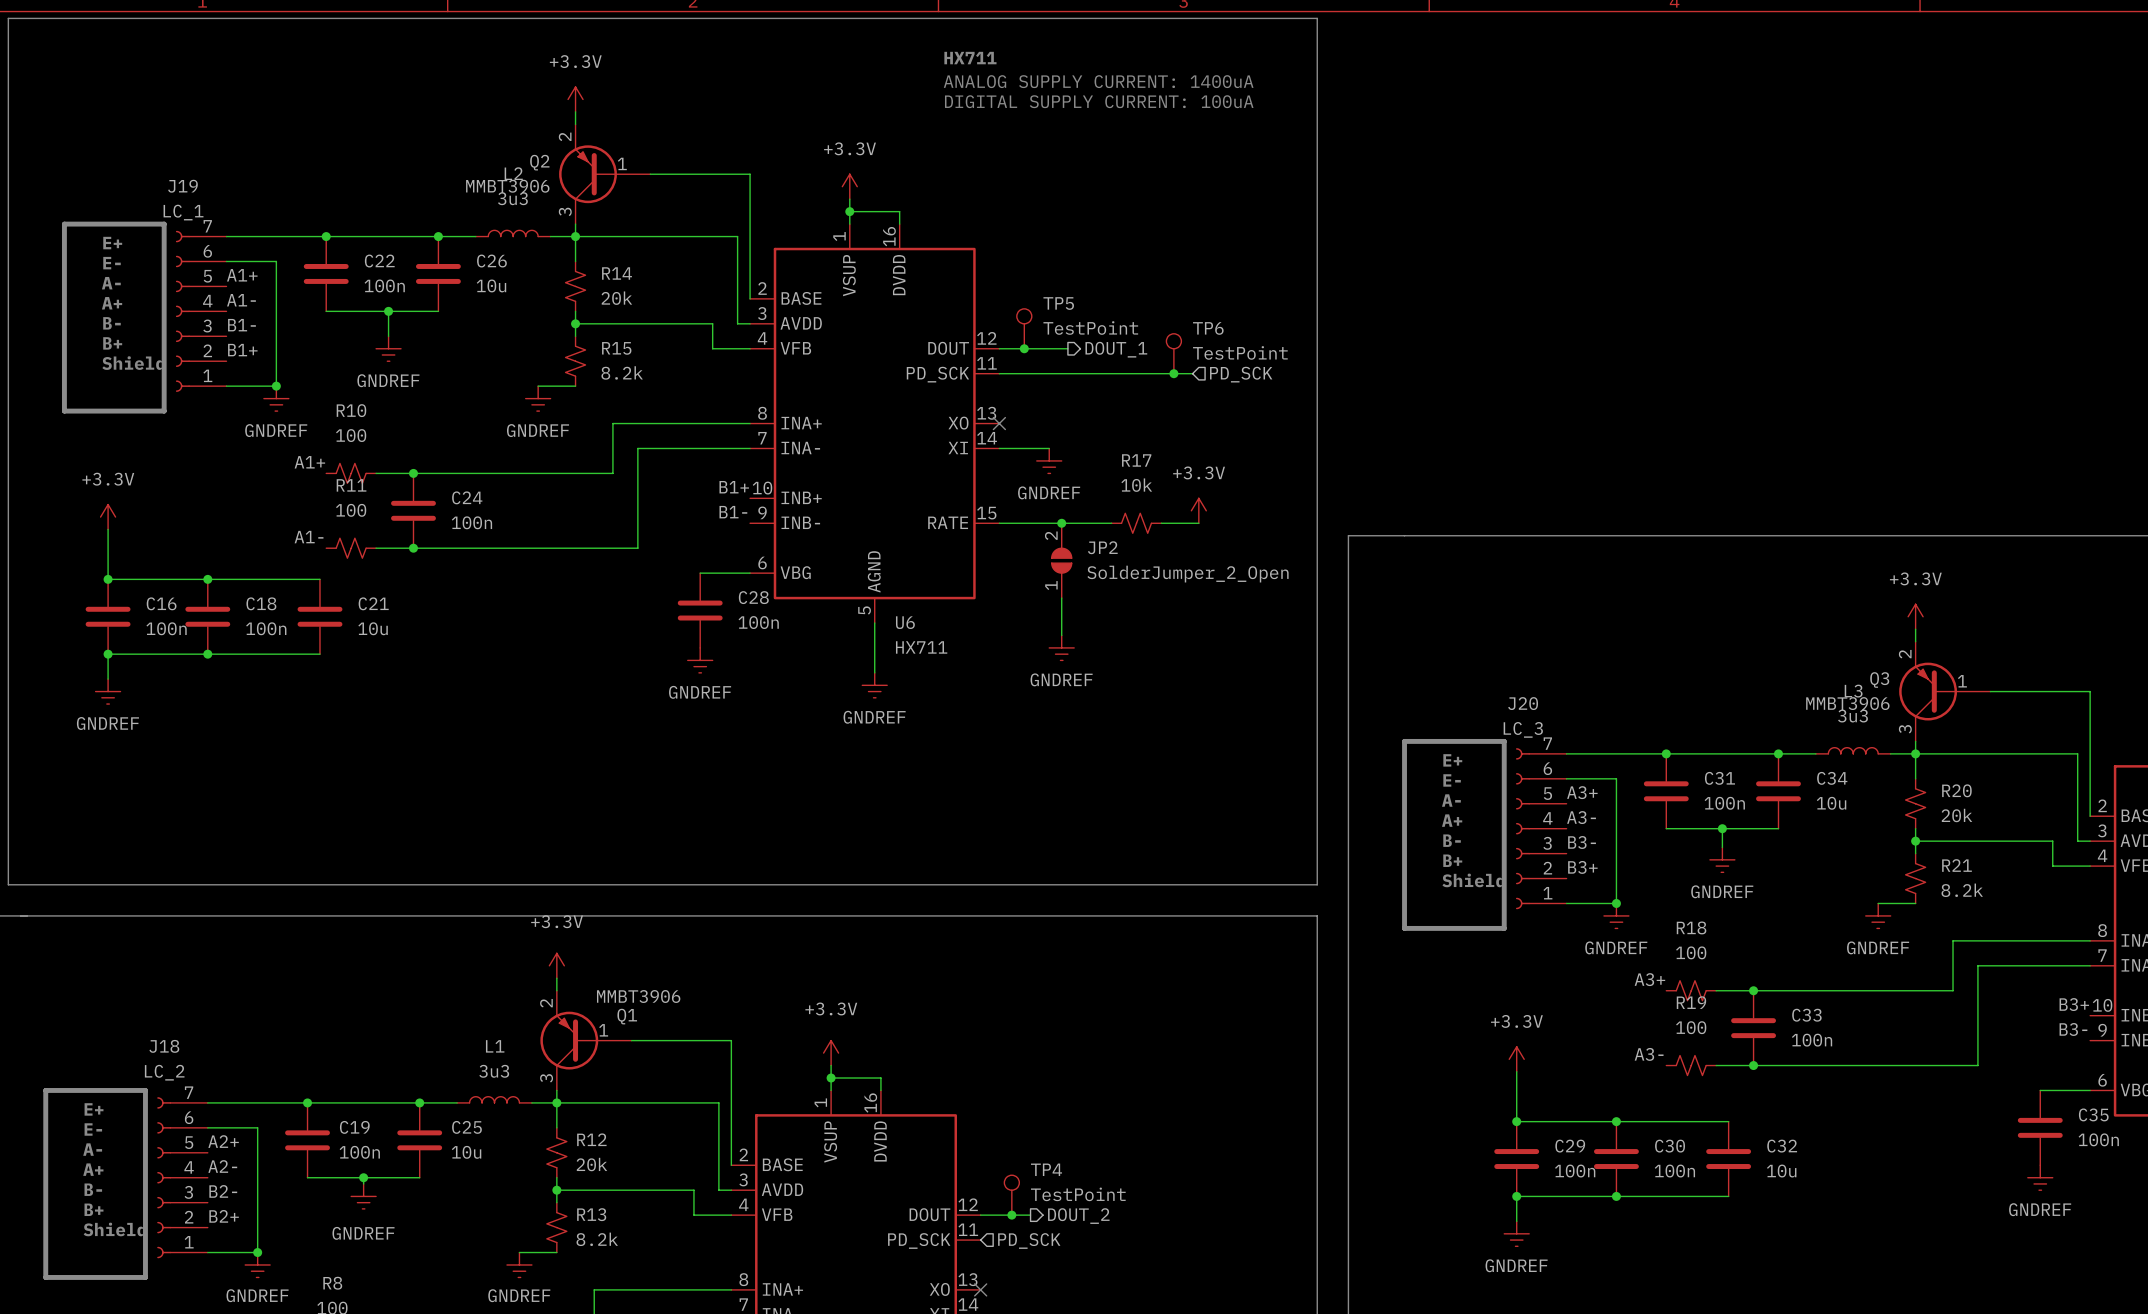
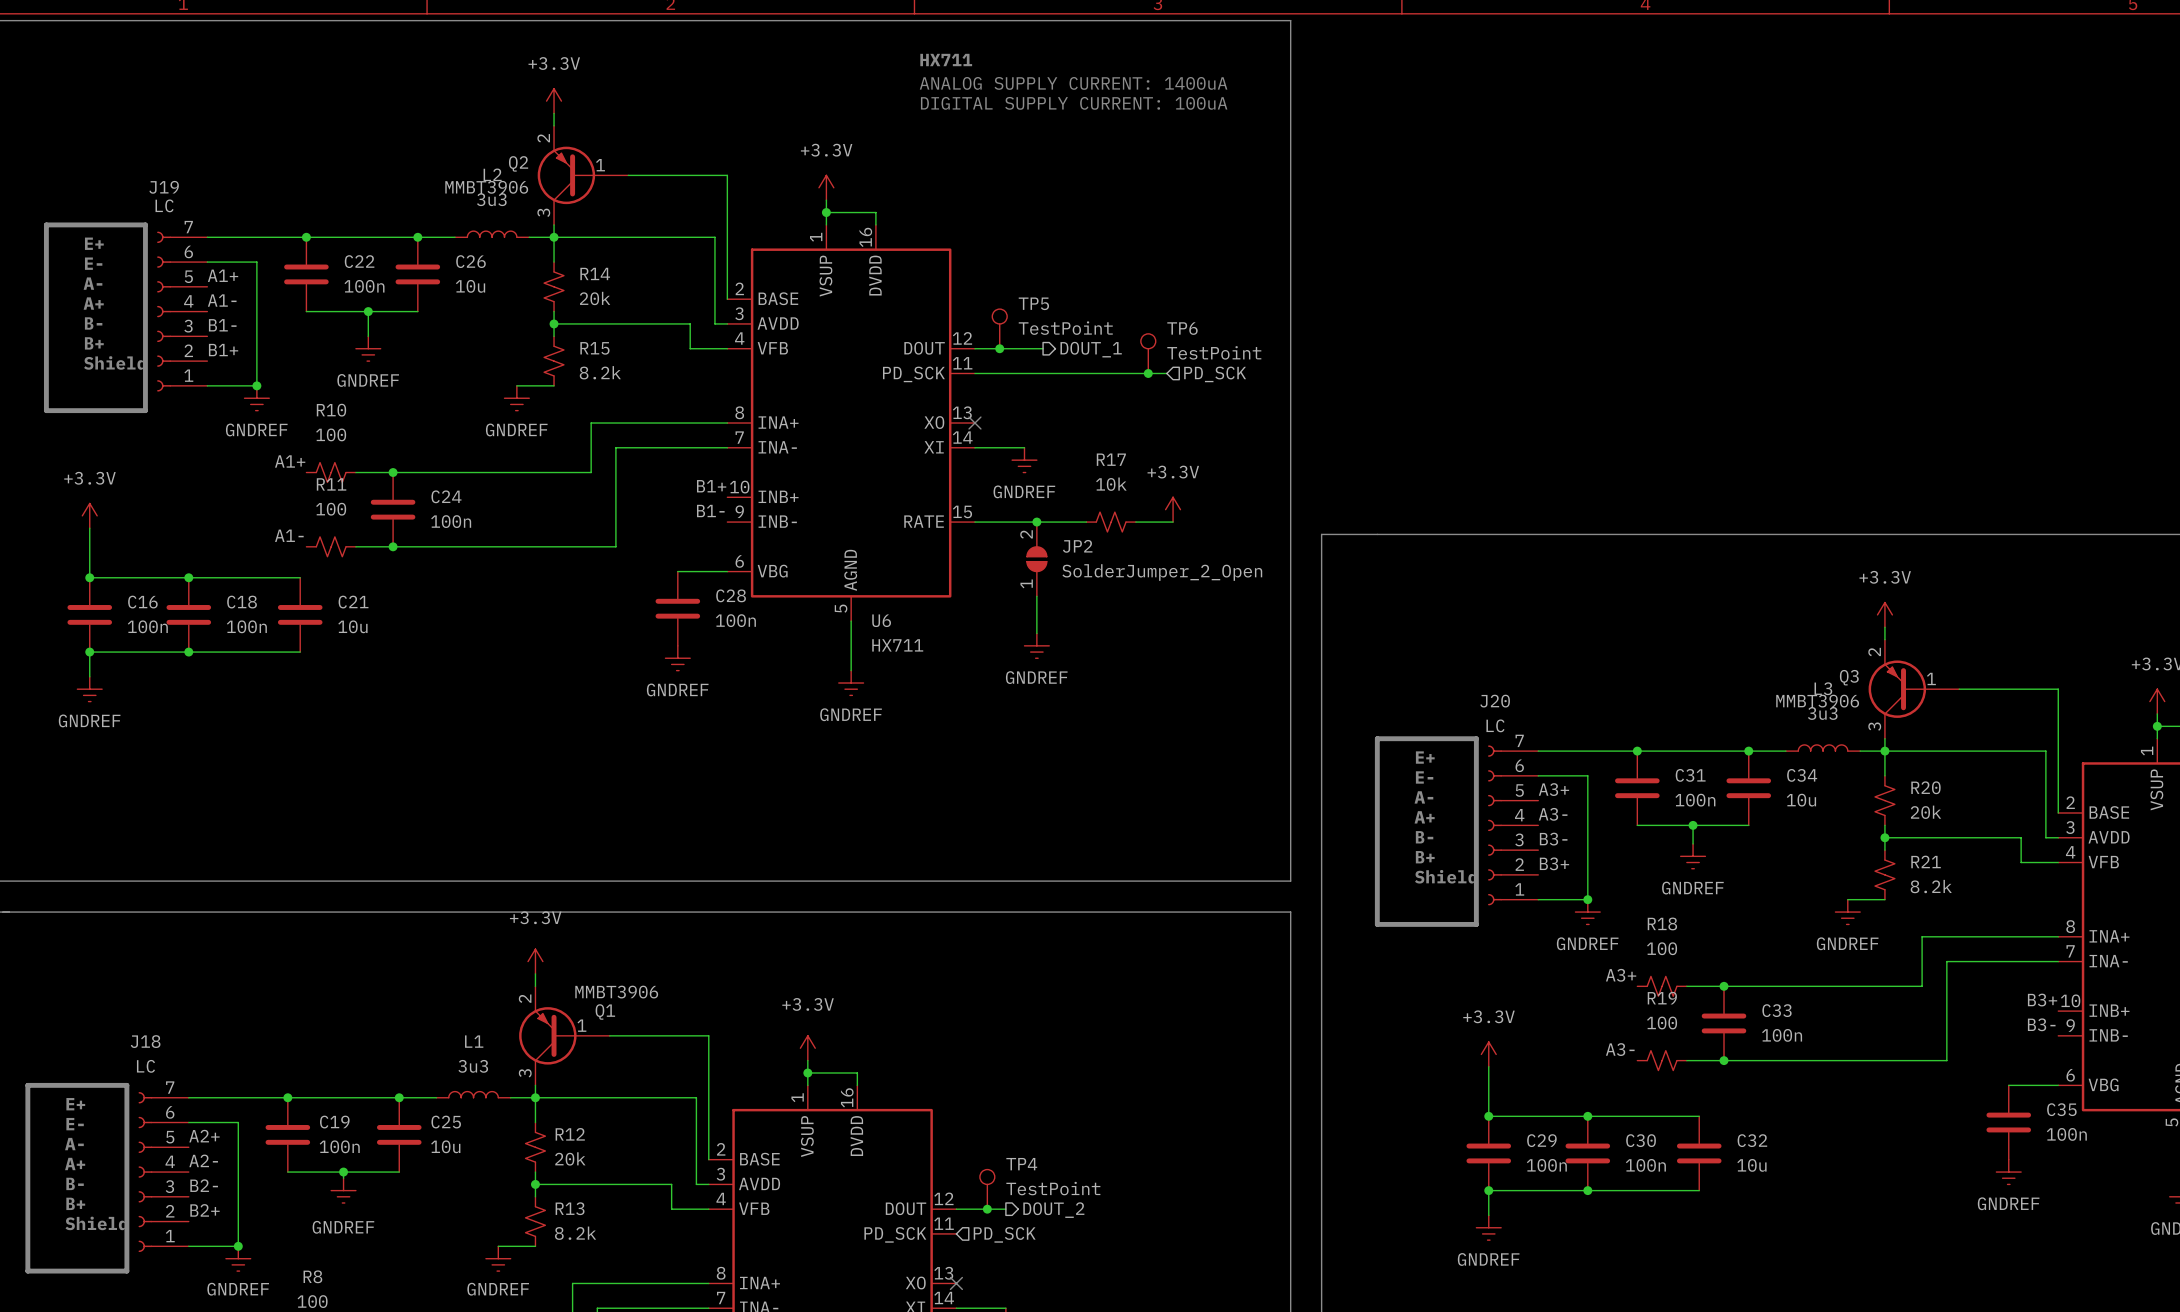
J19 value: LC_1 (183, 212) -> LC (164, 205)
J20 value: LC_3 (1523, 729) -> LC (1495, 725)
J18 value: LC_2 (164, 1072) -> LC (145, 1066)

